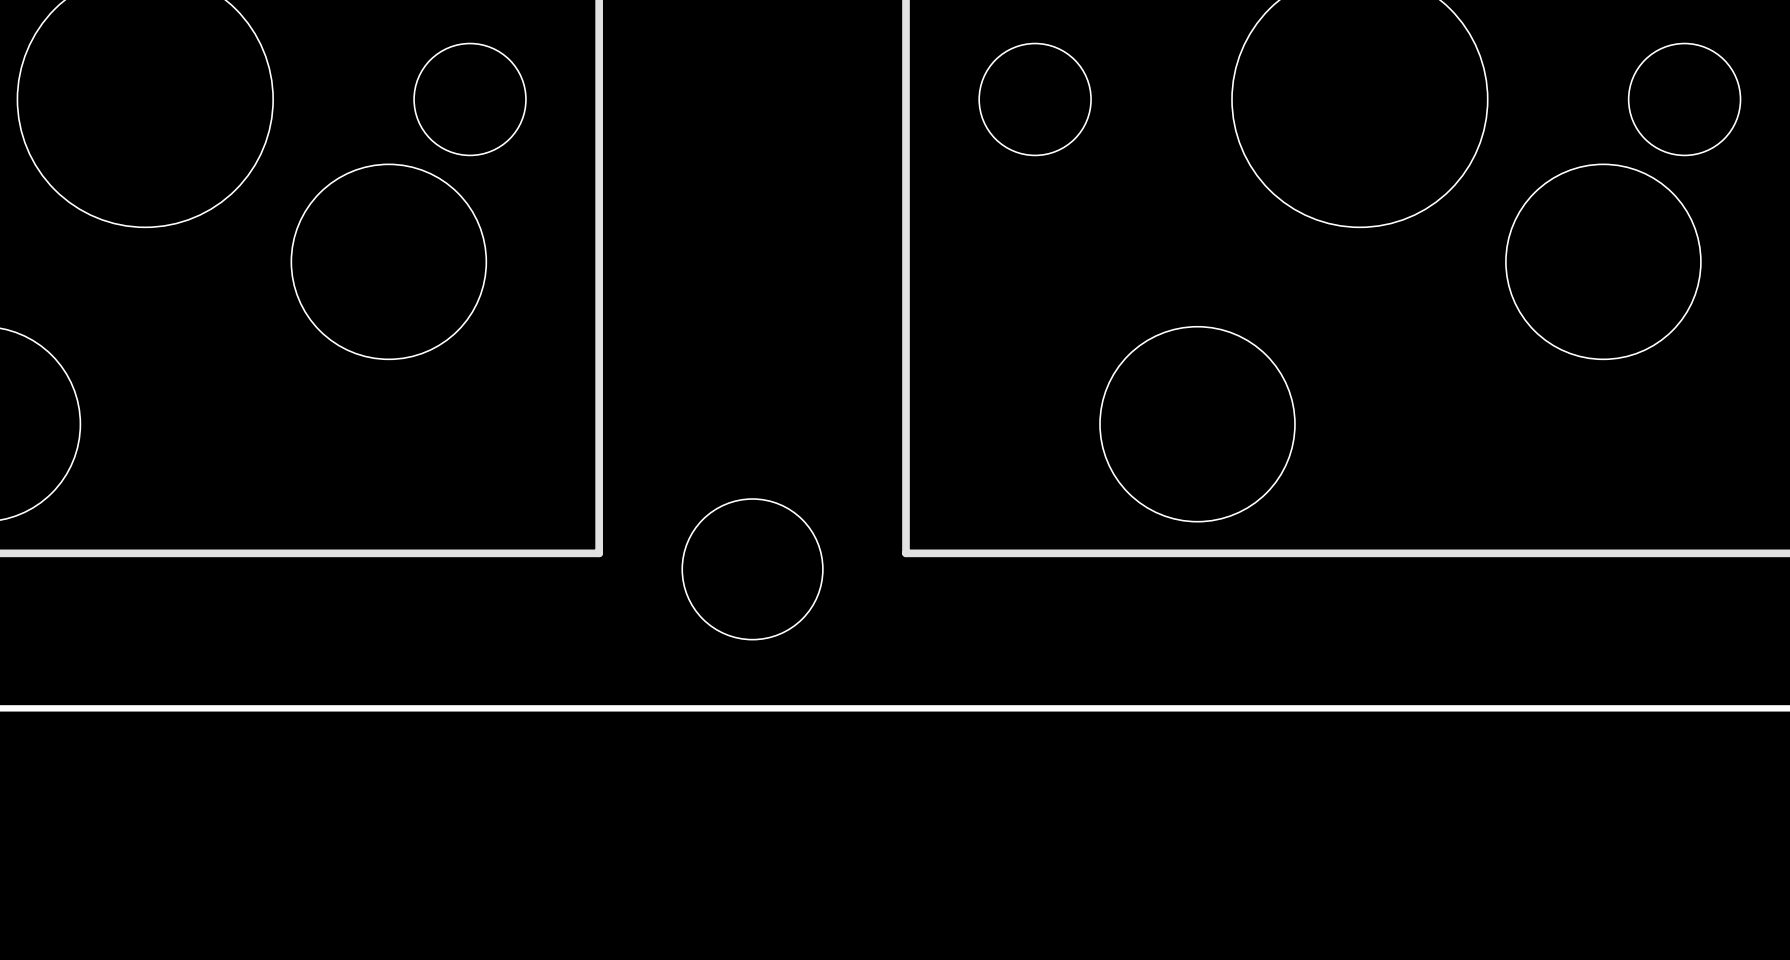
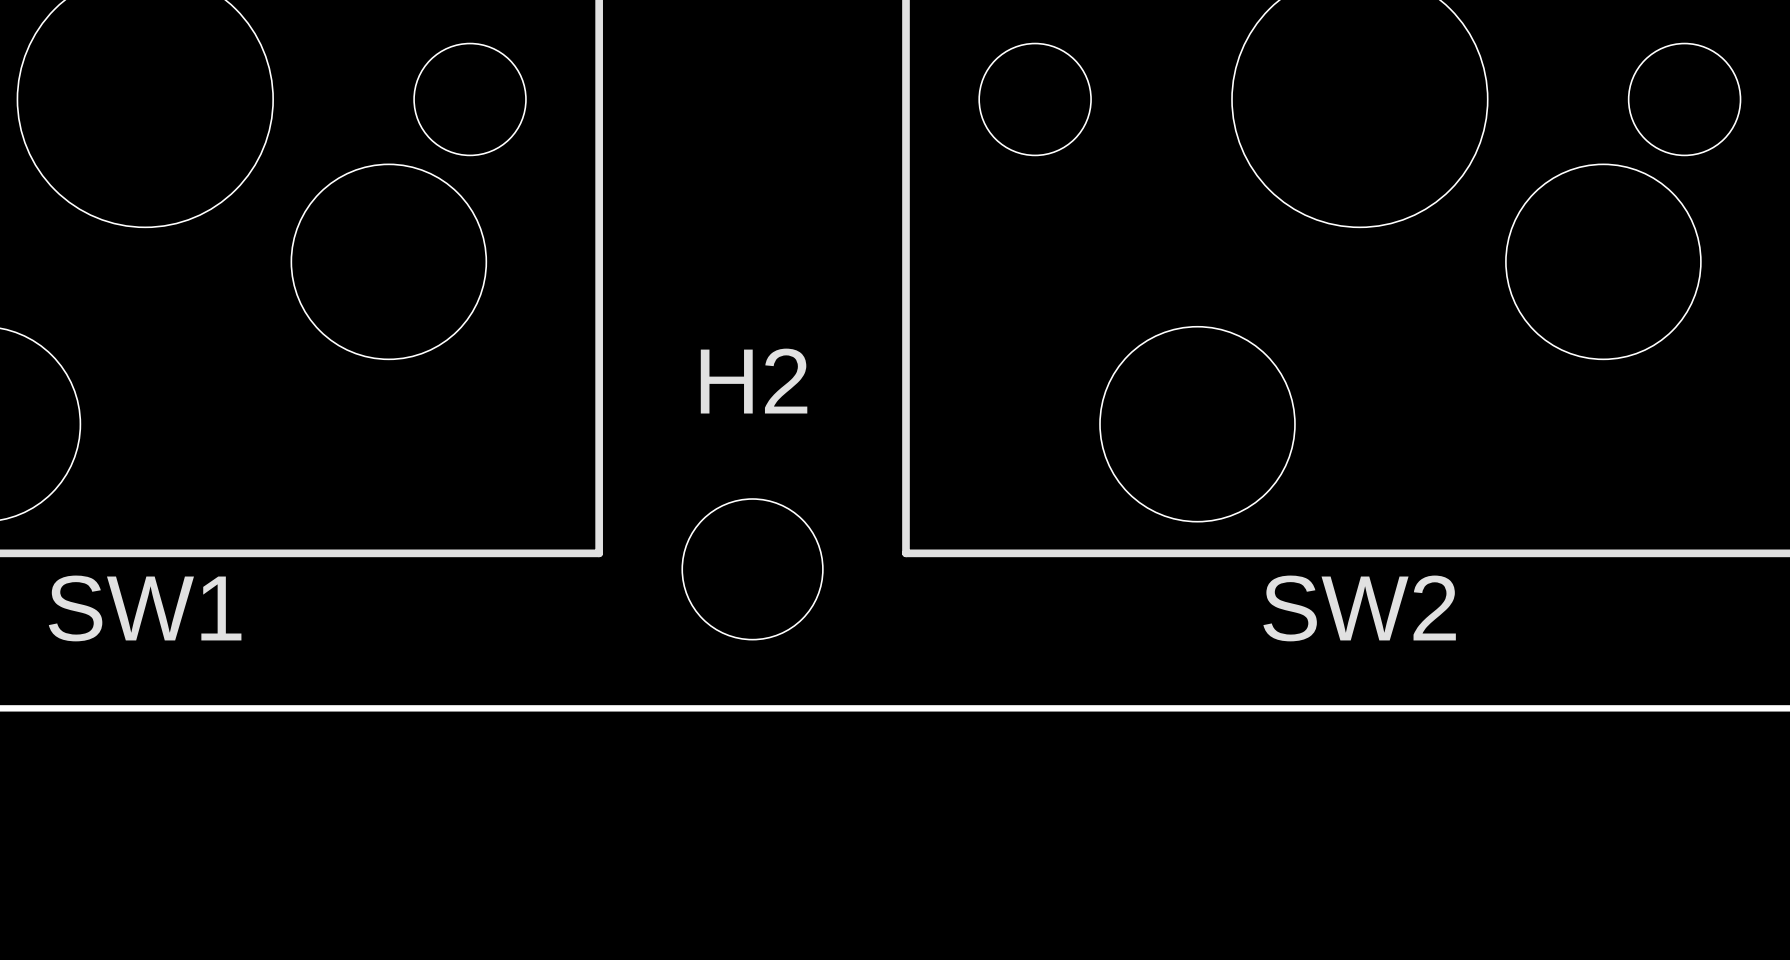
H2 name: none -> H2 (754, 381)
SW1 name: none -> SW1 (145, 608)
SW2 name: none -> SW2 (1359, 608)

